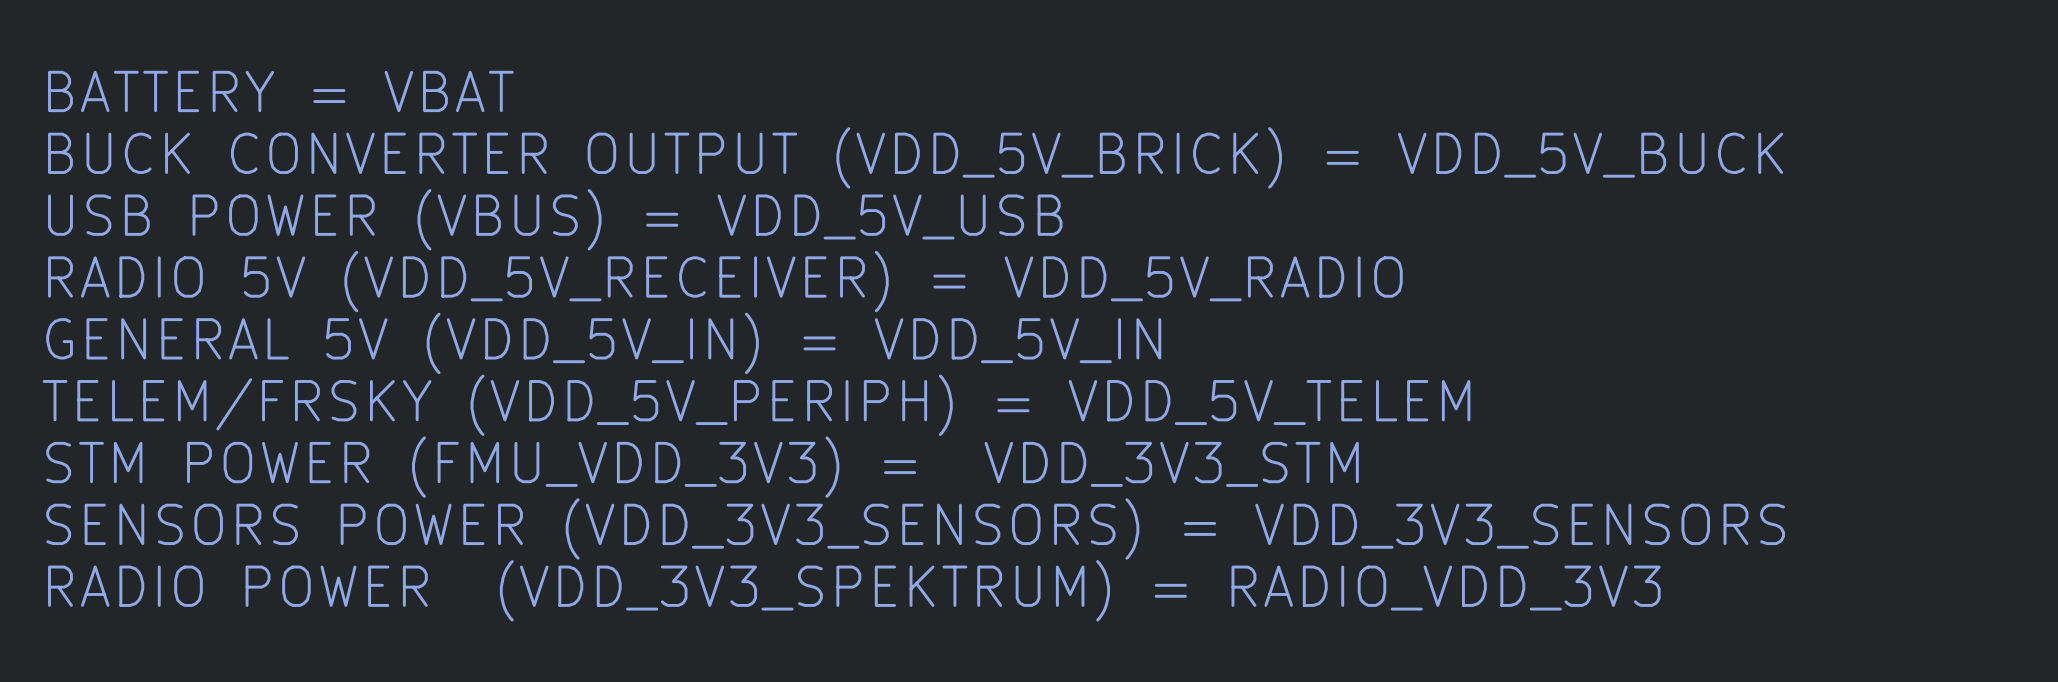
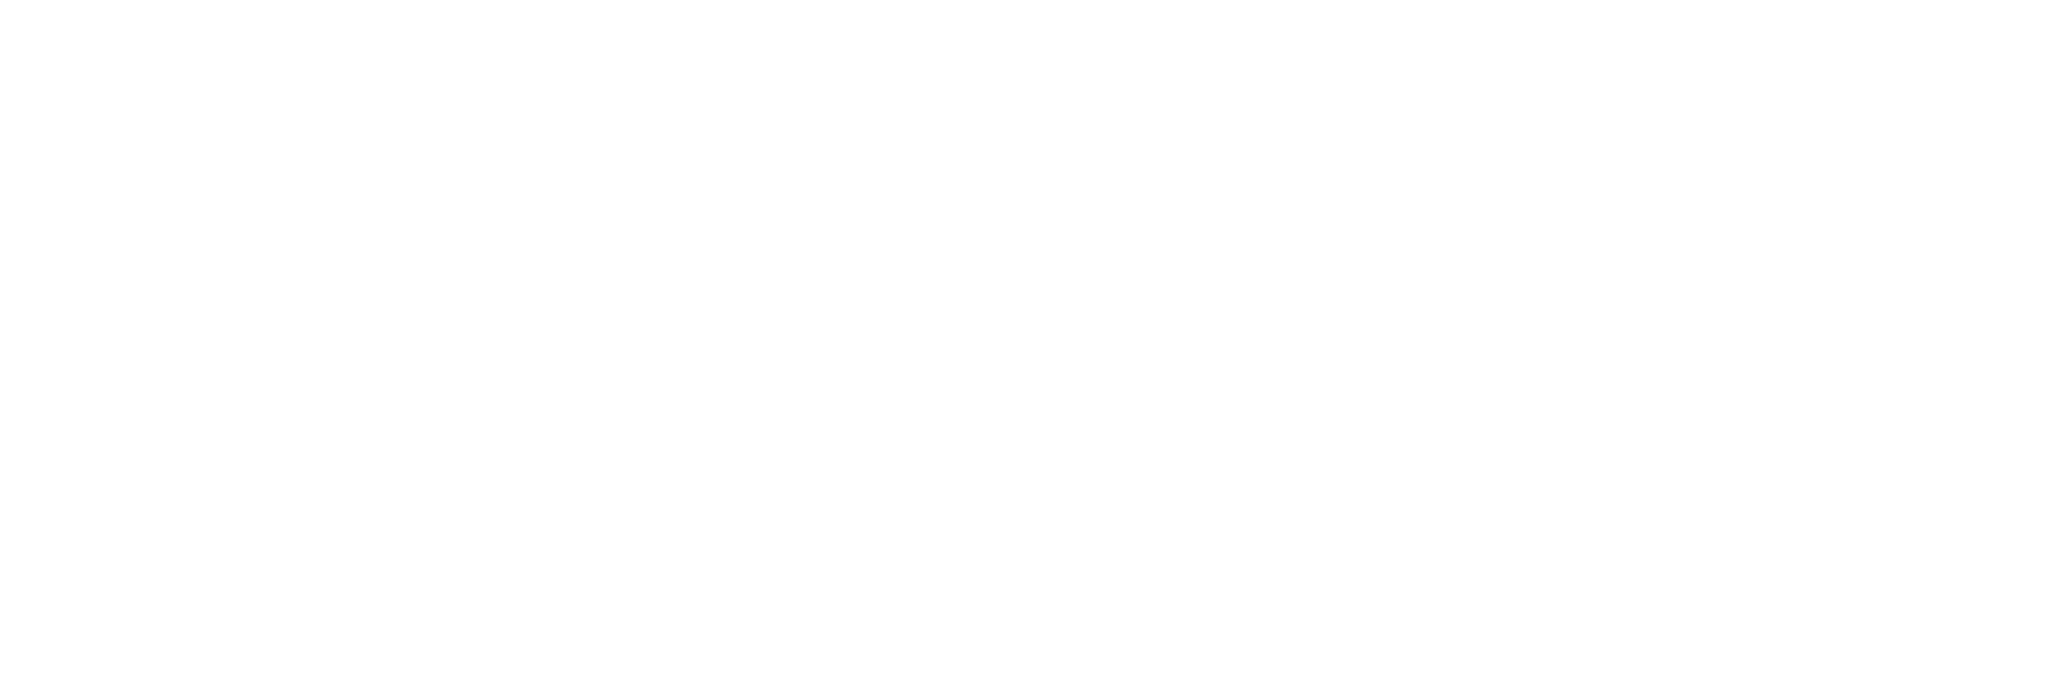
text: BATTERY = VBAT (280, 91) -> none
text: BUCK CONVERTER OUTPUT (VDD_5V_BRICK) = VDD_5V_BUCK (915, 157) -> none
text: USB POWER (VBUS) = VDD_5V_USB (555, 219) -> none
text: RADIO 5V (VDD_5V_RECEIVER) = VDD_5V_RADIO (725, 281) -> none
text: GENERAL 5V (VDD_5V_IN) = VDD_5V_IN (603, 343) -> none
text: TELEM/FRSKY (VDD_5V_PERIPH) = VDD_5V_TELEM (756, 405) -> none
text: STM POWER (FMU_VDD_3V3) = VDD_3V3_STM (702, 467) -> none
text: SENSORS POWER (VDD_3V3_SENSORS) = VDD_3V3_SENSORS (915, 528) -> none
text: RADIO POWER (VDD_3V3_SPEKTRUM) = RADIO_VDD_3V3 (854, 590) -> none

